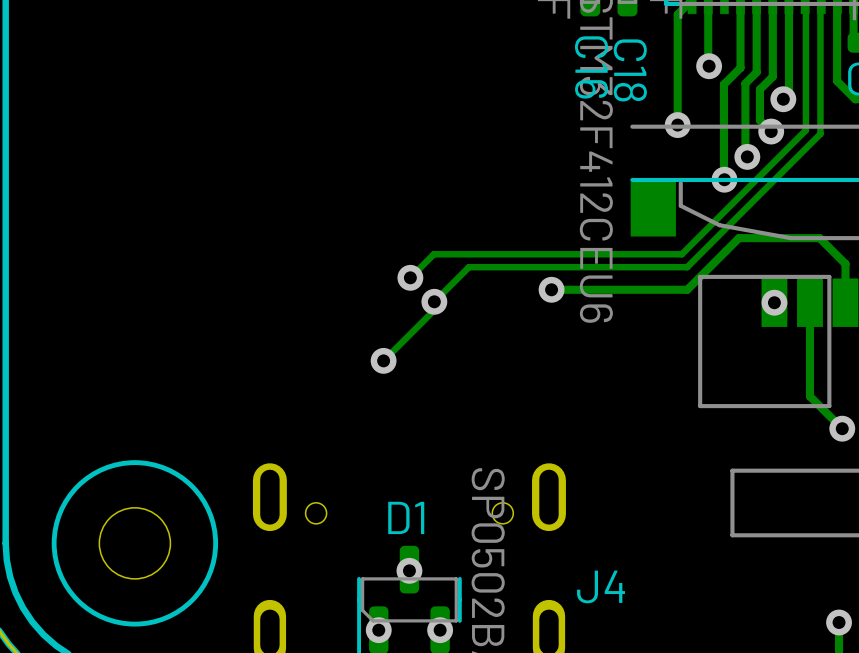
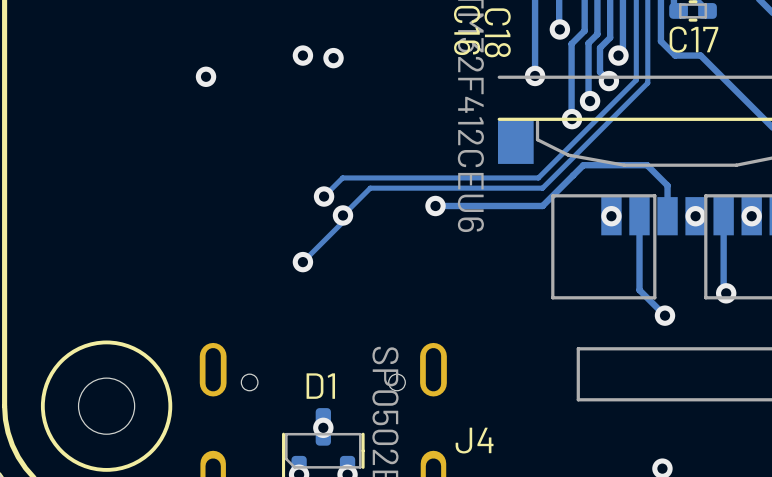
via: none -> (302, 55)
via: none -> (333, 58)
via: none -> (206, 76)

